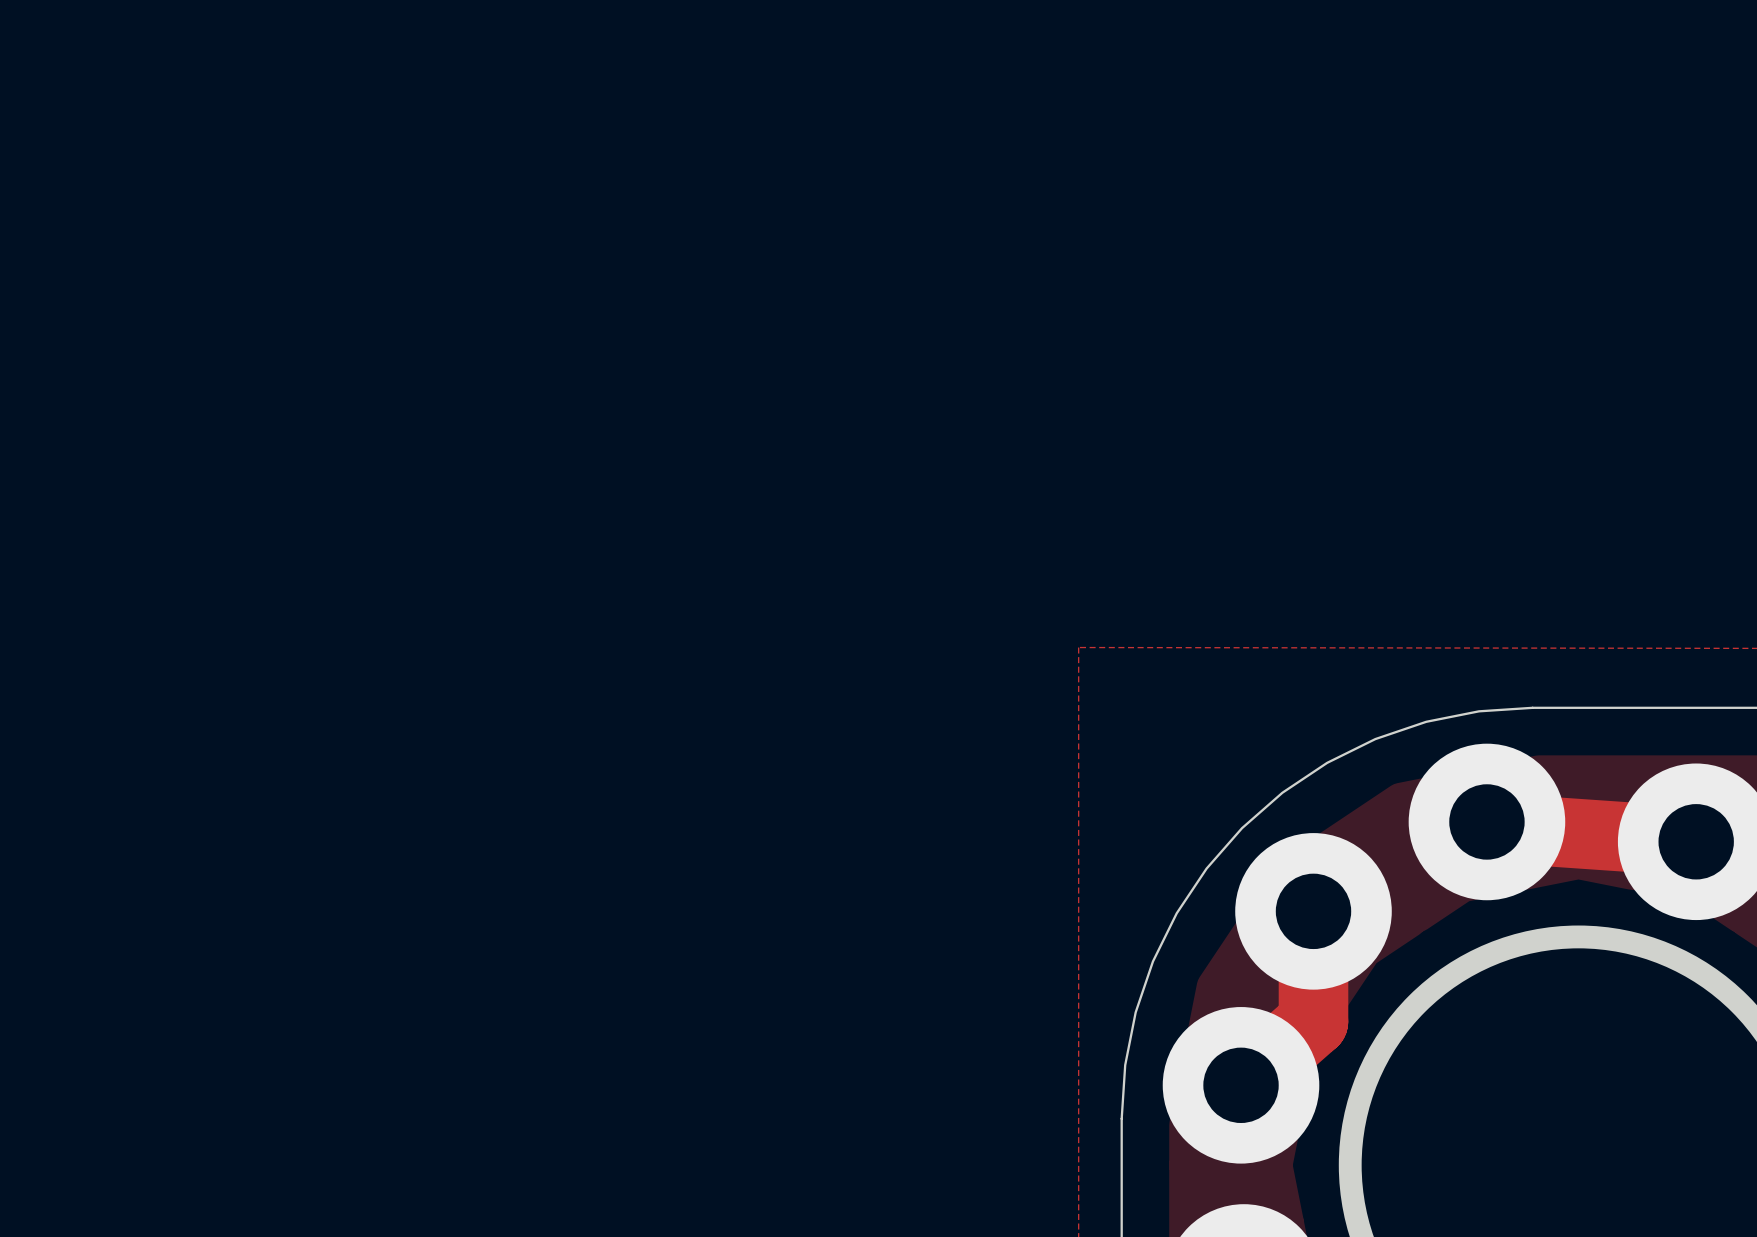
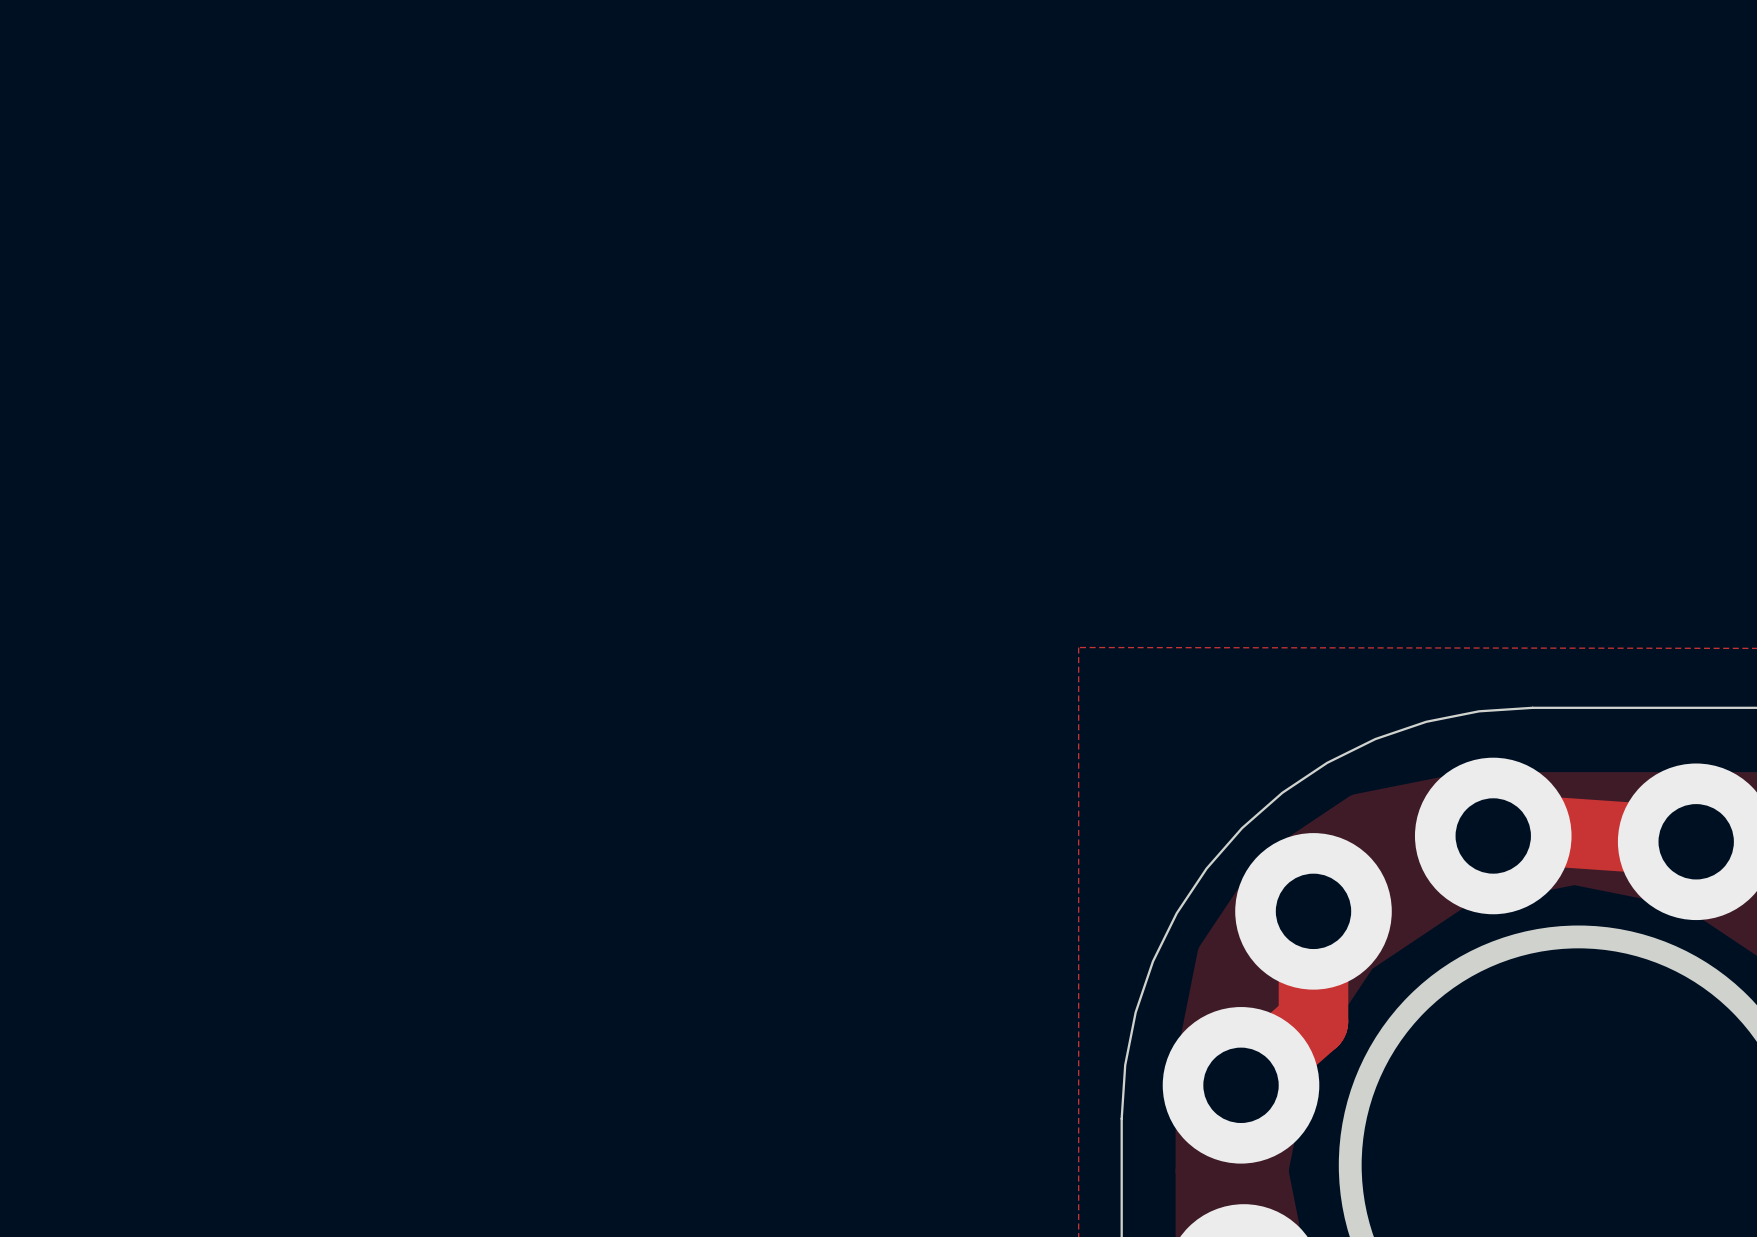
via position: (1486, 821) -> (1493, 835)

